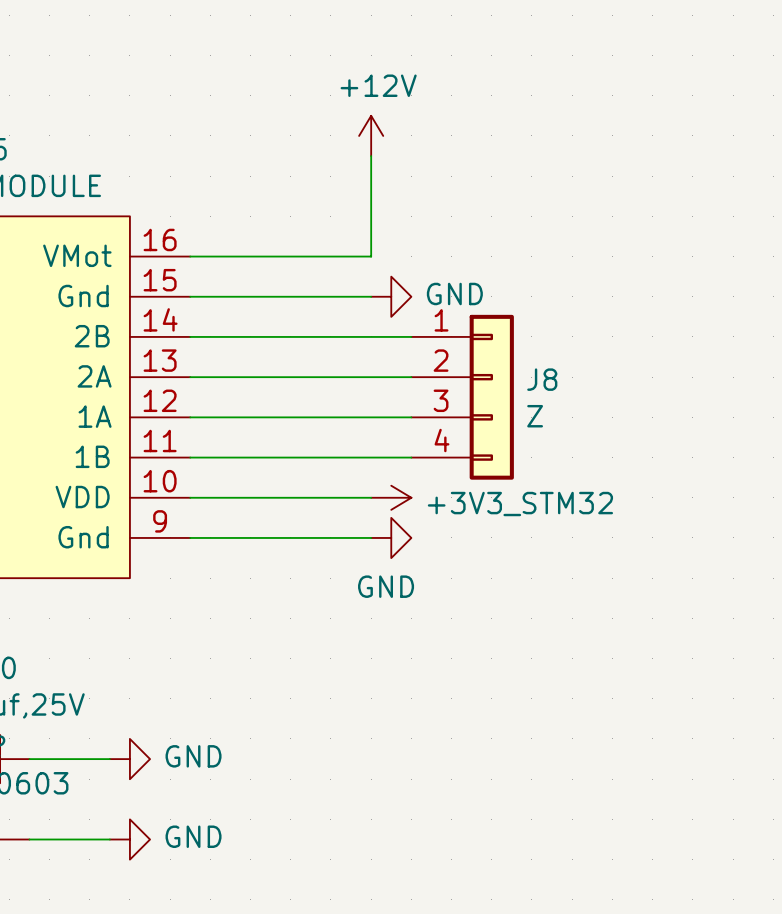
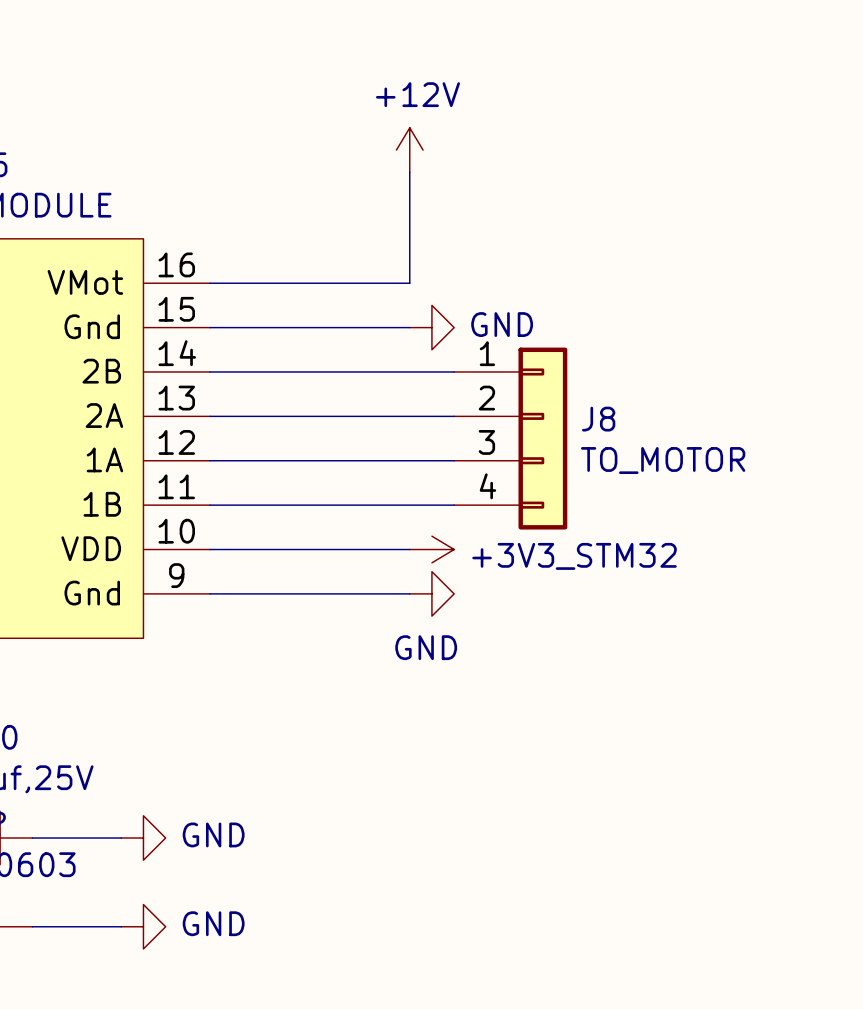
J8 value: Z (535, 416) -> TO_MOTOR (663, 460)

